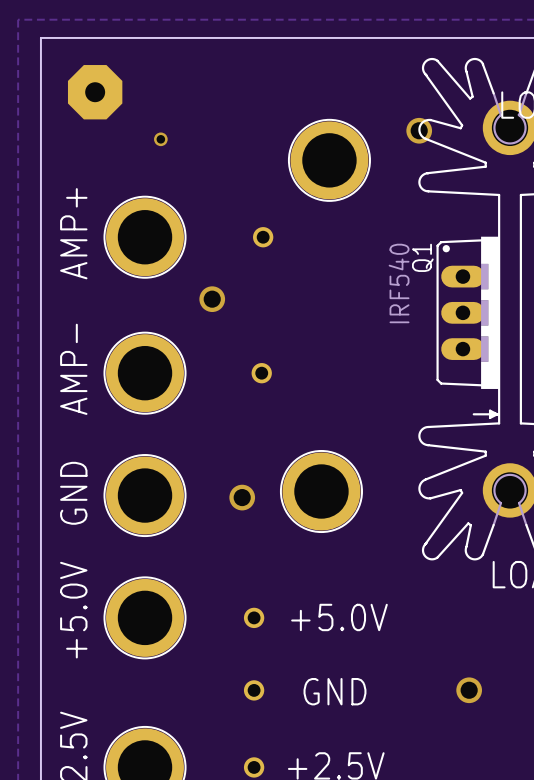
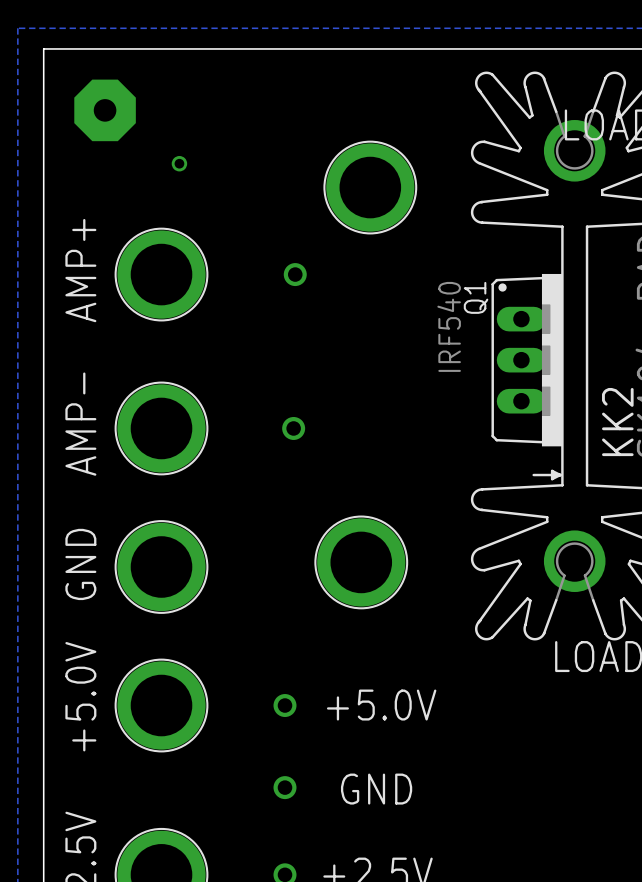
via: (419, 130) -> none
via: (212, 299) -> none
via: (242, 497) -> none
via: (469, 690) -> none

